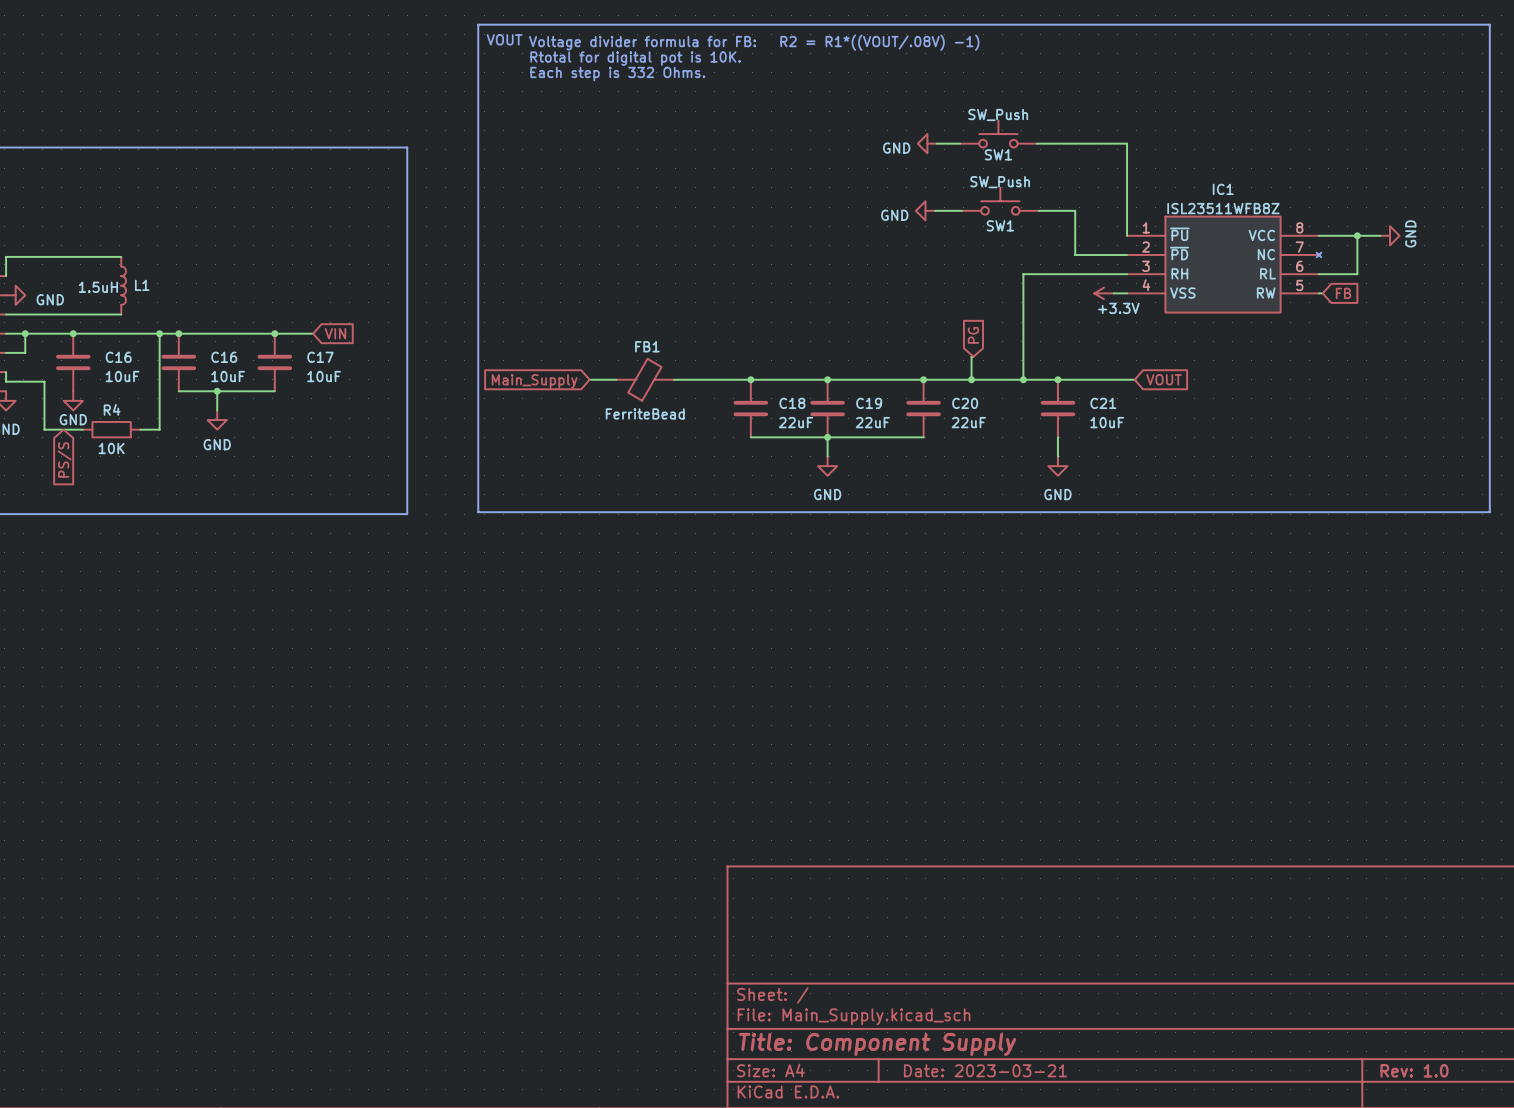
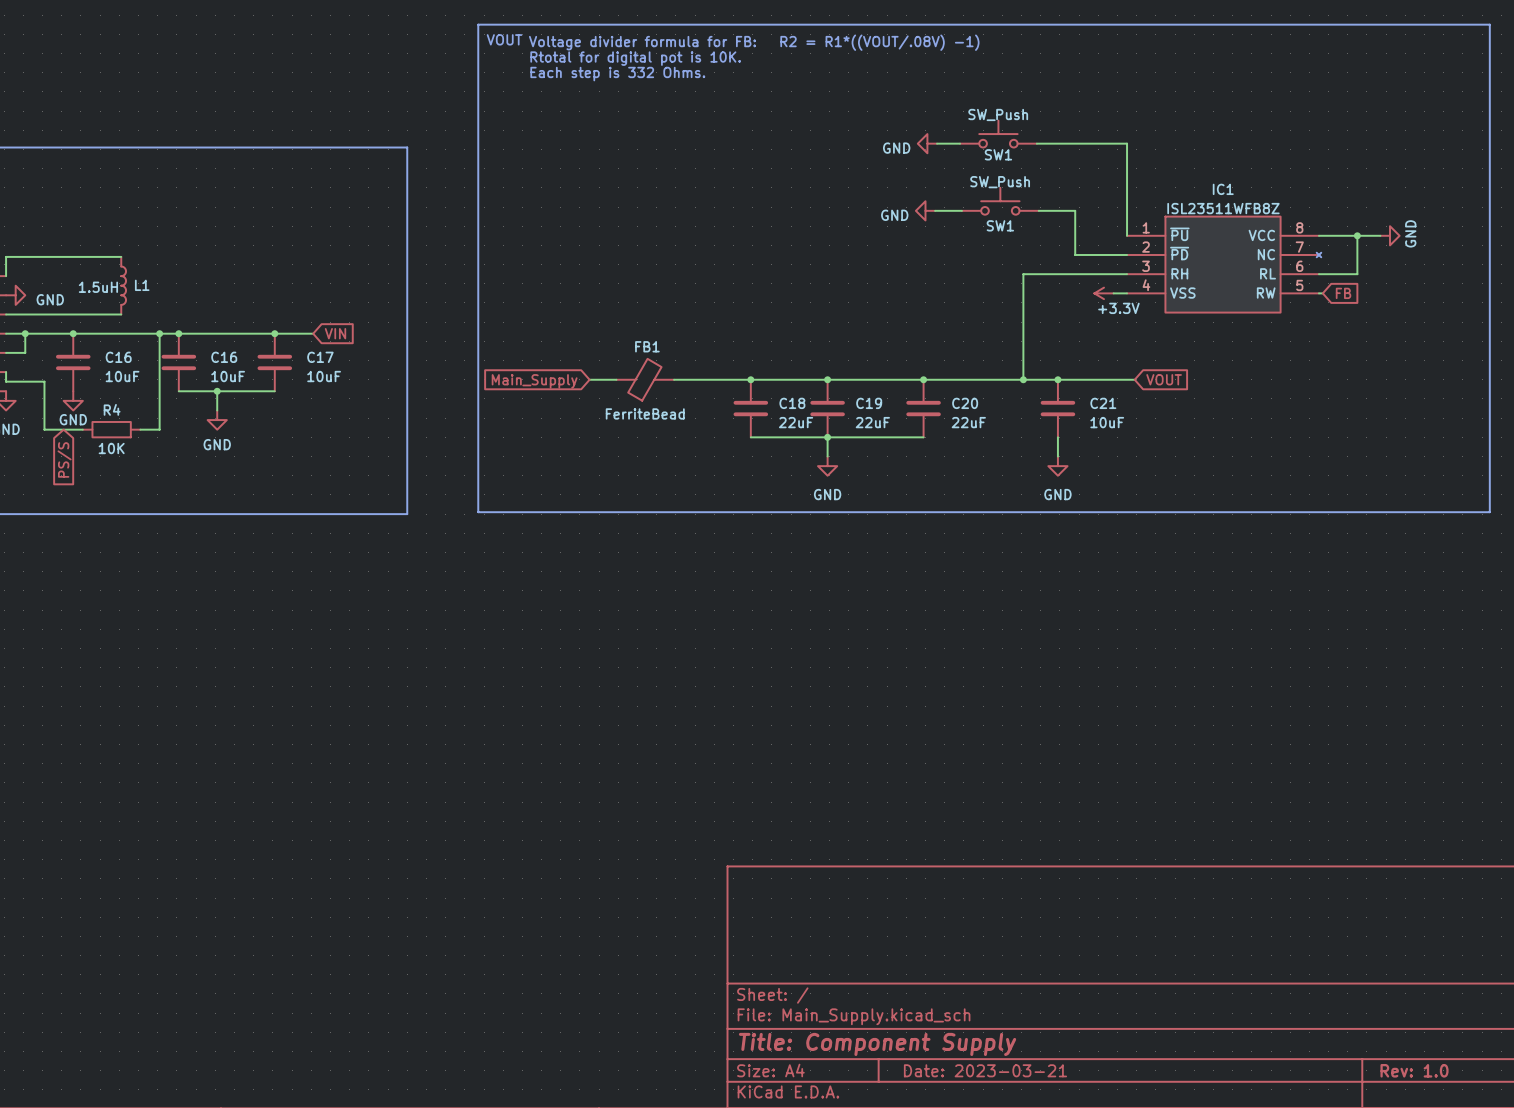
global label: PG (973, 335) -> none
wire: (973, 356) (971, 356) (971, 379) -> none
junction: (971, 379) -> none

